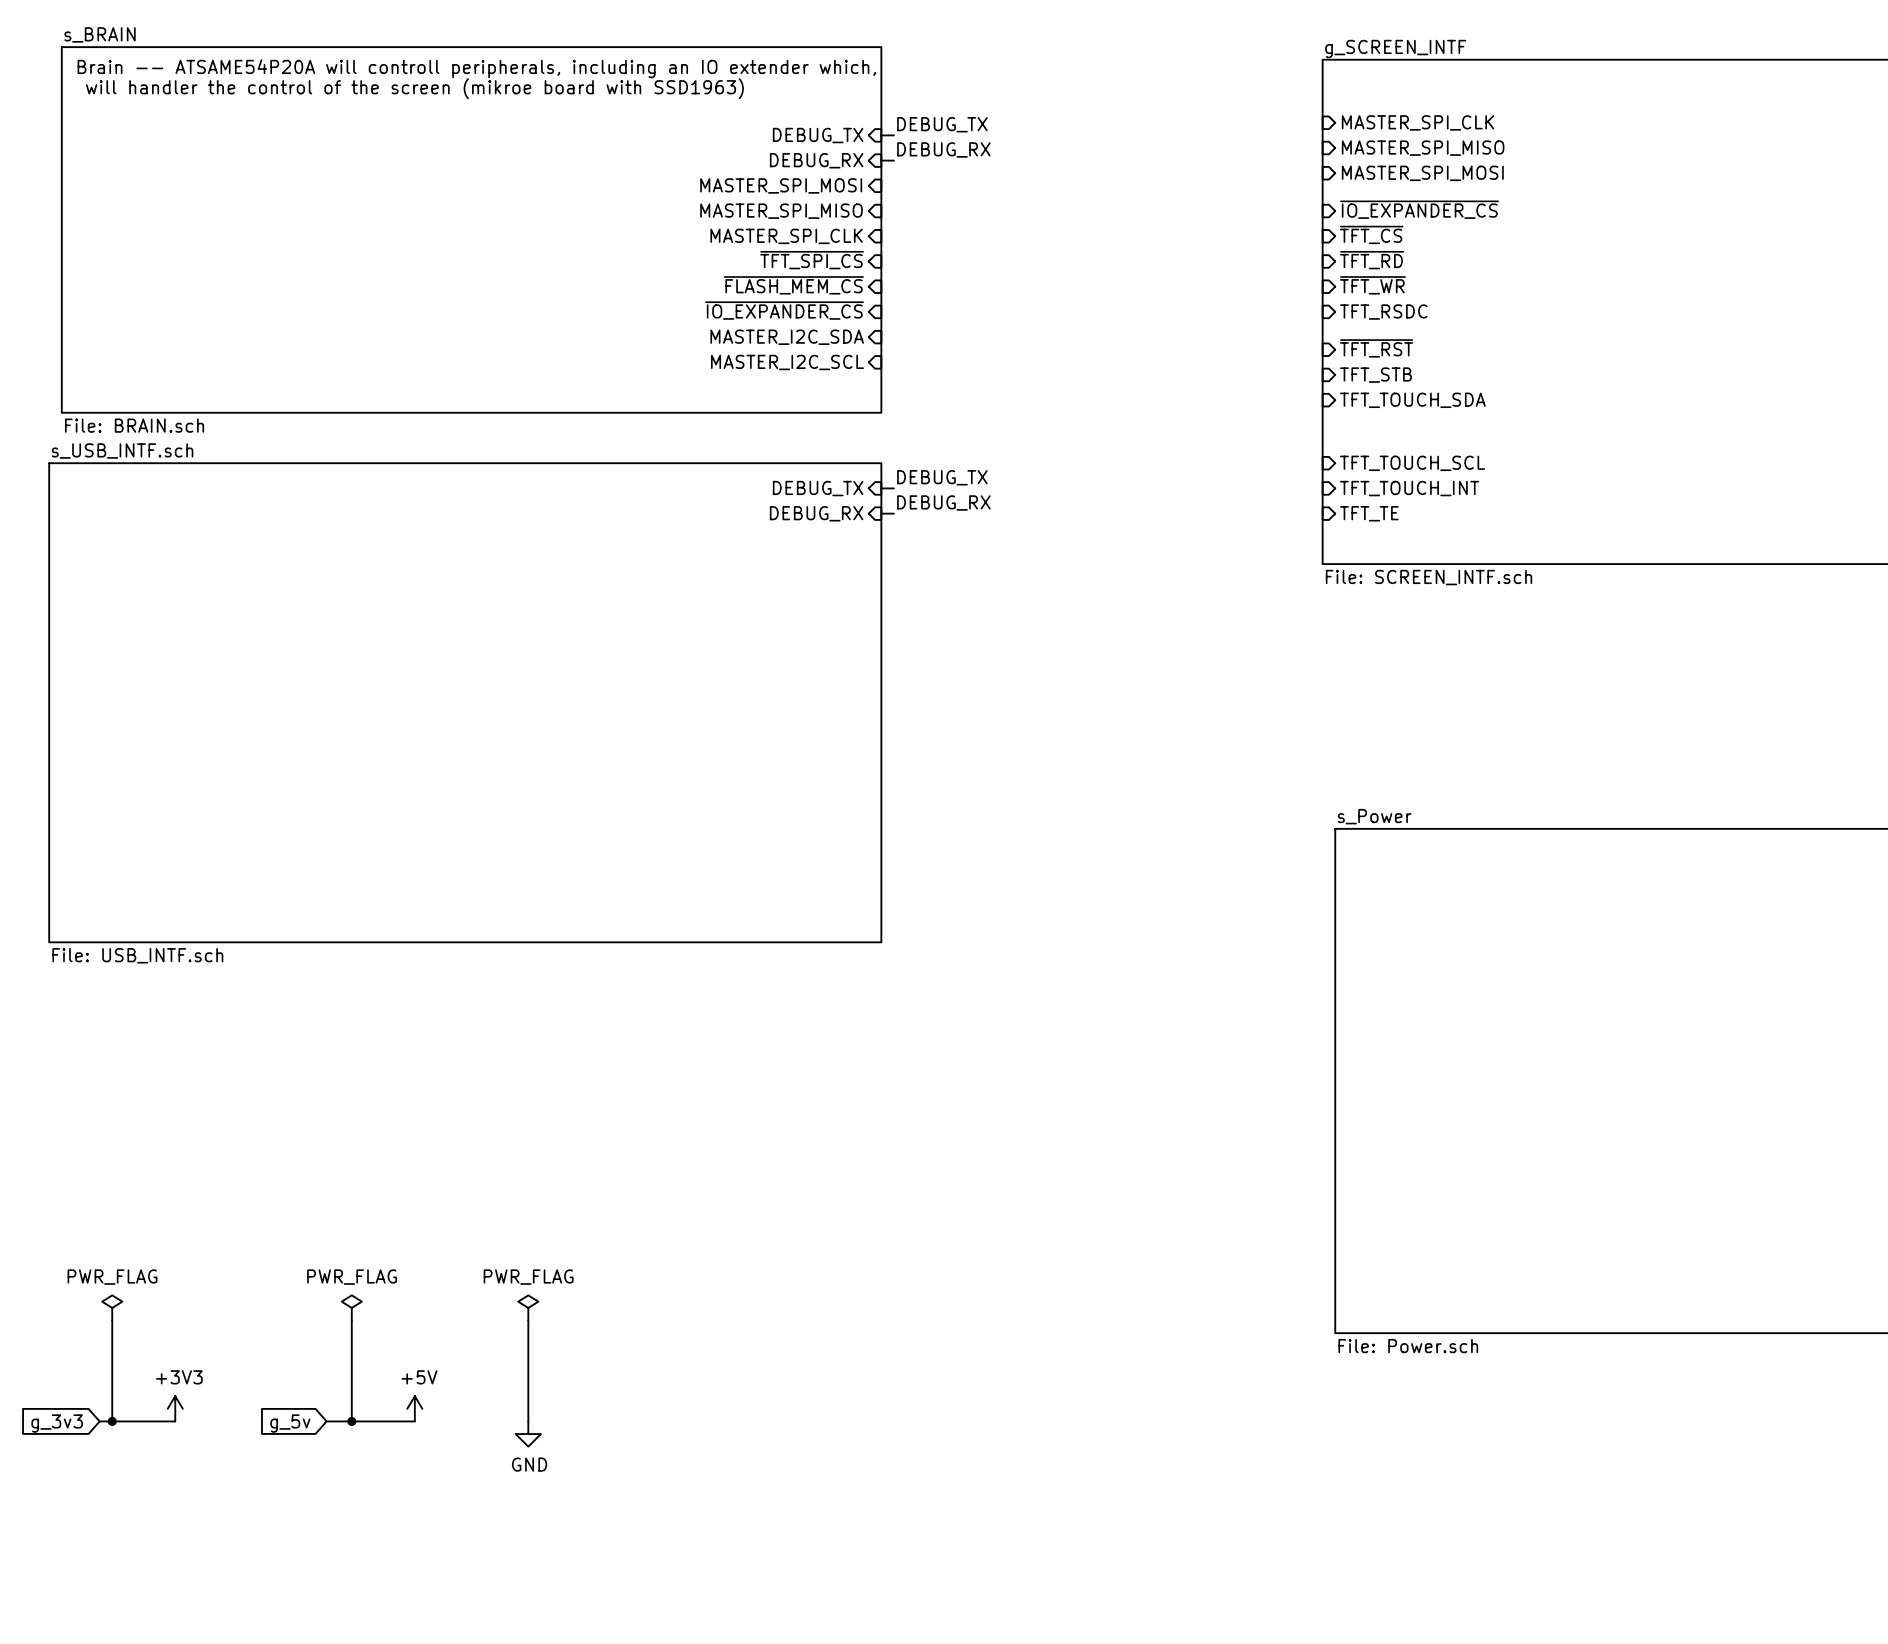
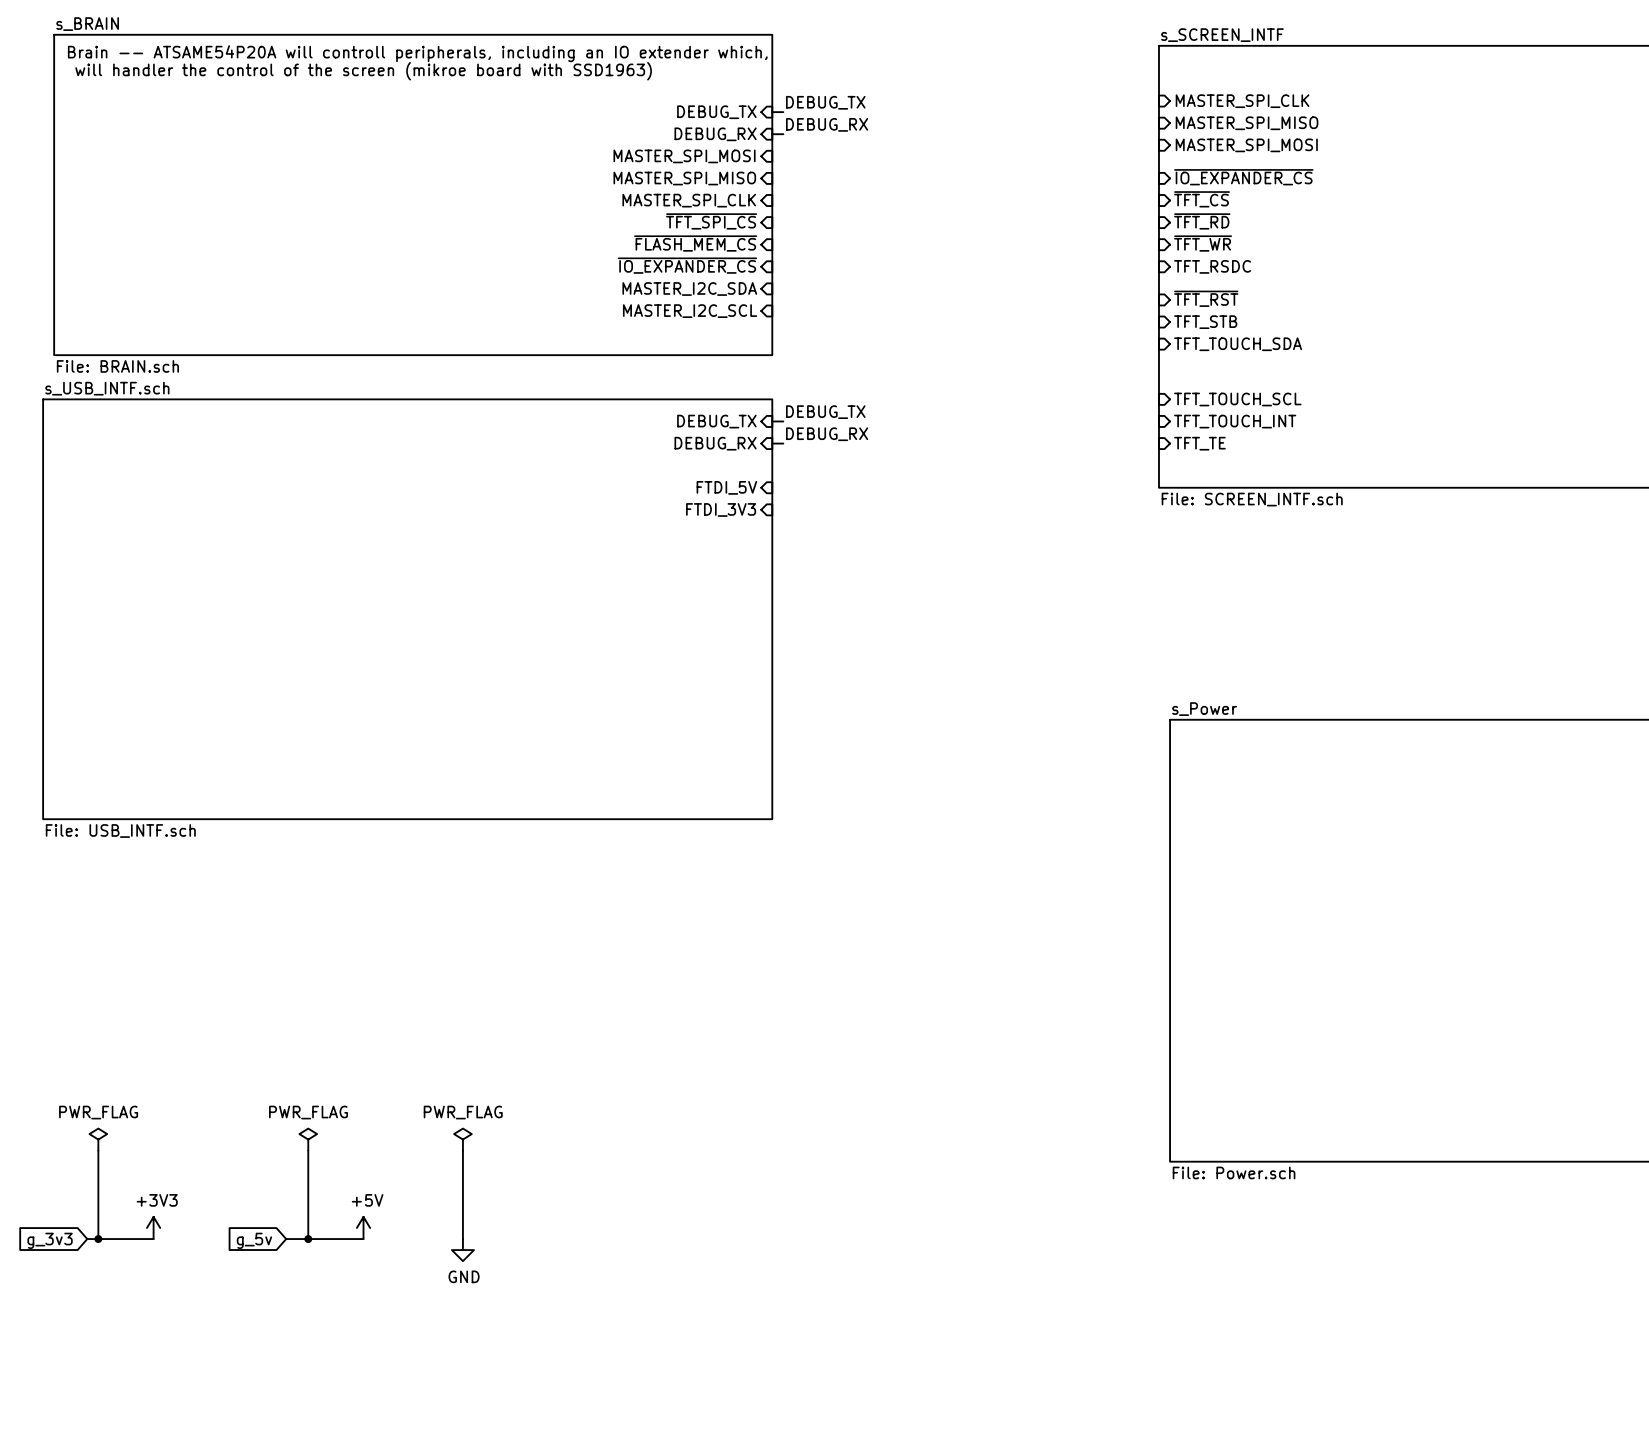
sheet g_SCREEN_INTF name: g_SCREEN_INTF (1395, 49) -> s_SCREEN_INTF (1222, 35)
sheet pin: none -> FTDI_5V (726, 487)
sheet pin: none -> FTDI_3V3 (721, 509)

